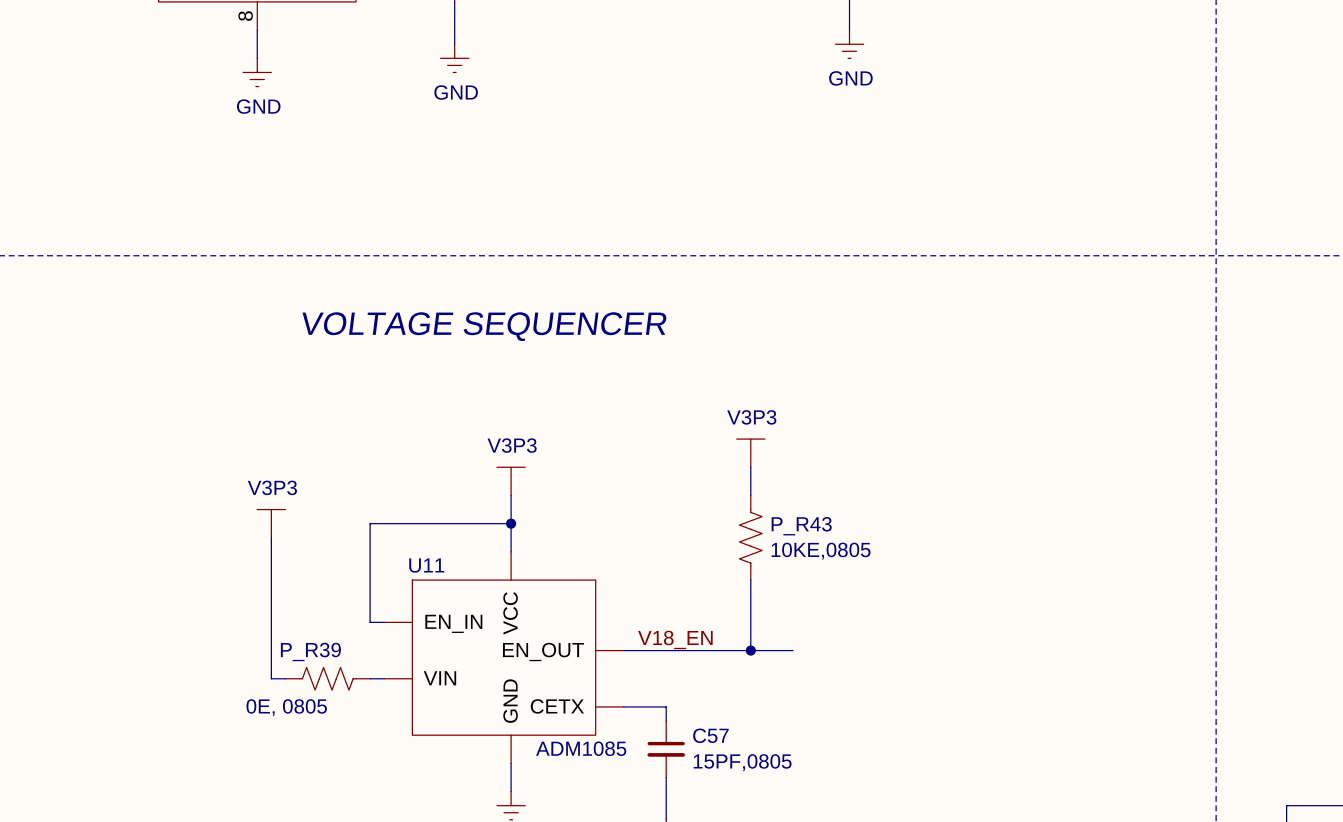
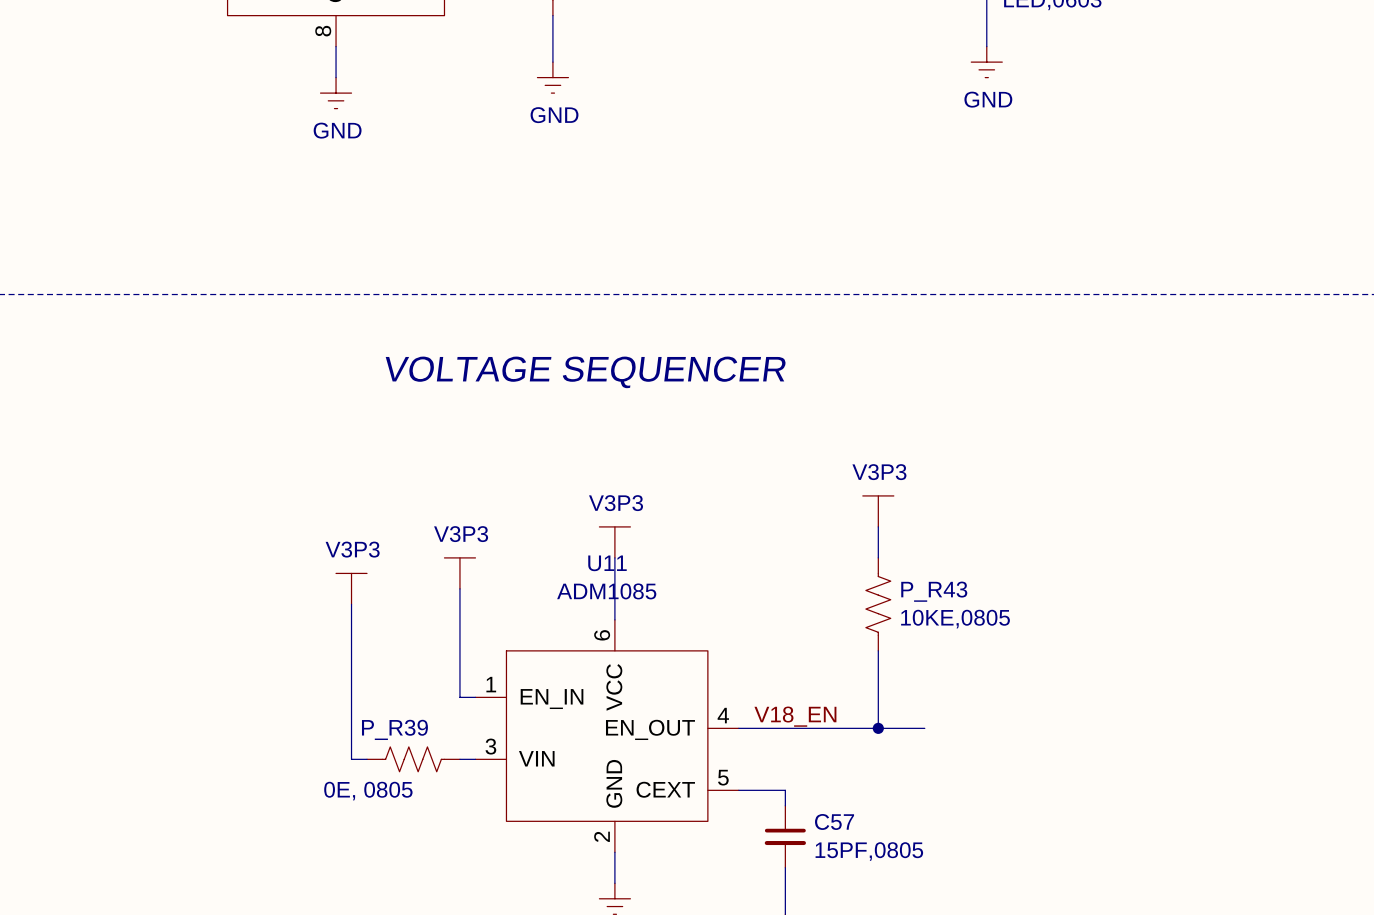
power symbol: none -> V3P3 (459, 573)
wire: (370, 523) (511, 523) -> none
junction: (511, 523) -> none
U11 name position: U11 (426, 565) -> U11 (607, 563)
U11 pin number: none -> 6 (602, 635)
U11 pin number: none -> 1 (491, 684)
U11 pin number: none -> 4 (723, 715)
U11 pin number: none -> 3 (490, 746)
U11 pin number: none -> 5 (723, 777)
U11 pin name: CETX (557, 706) -> CEXT (665, 789)
U11 value position: ADM1085 (581, 748) -> ADM1085 (606, 591)
U11 pin number: none -> 2 (602, 836)

